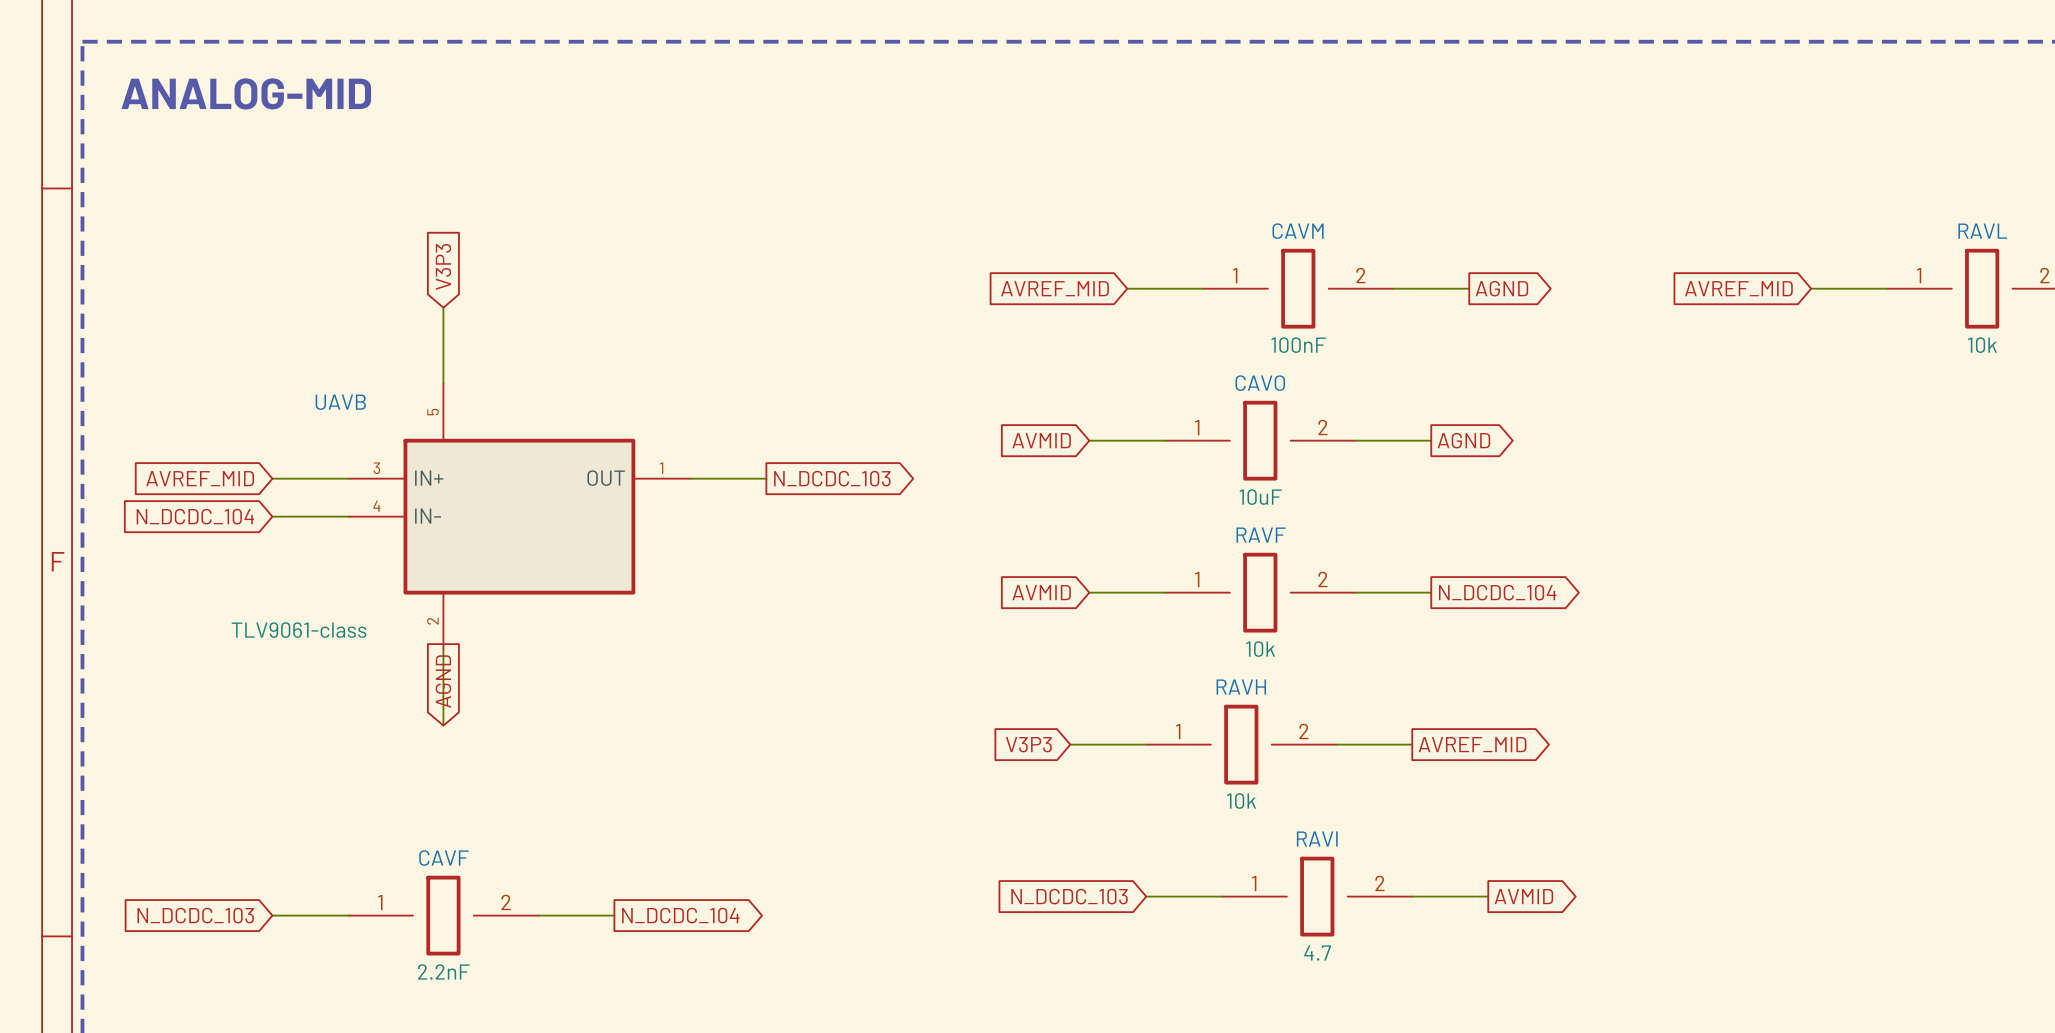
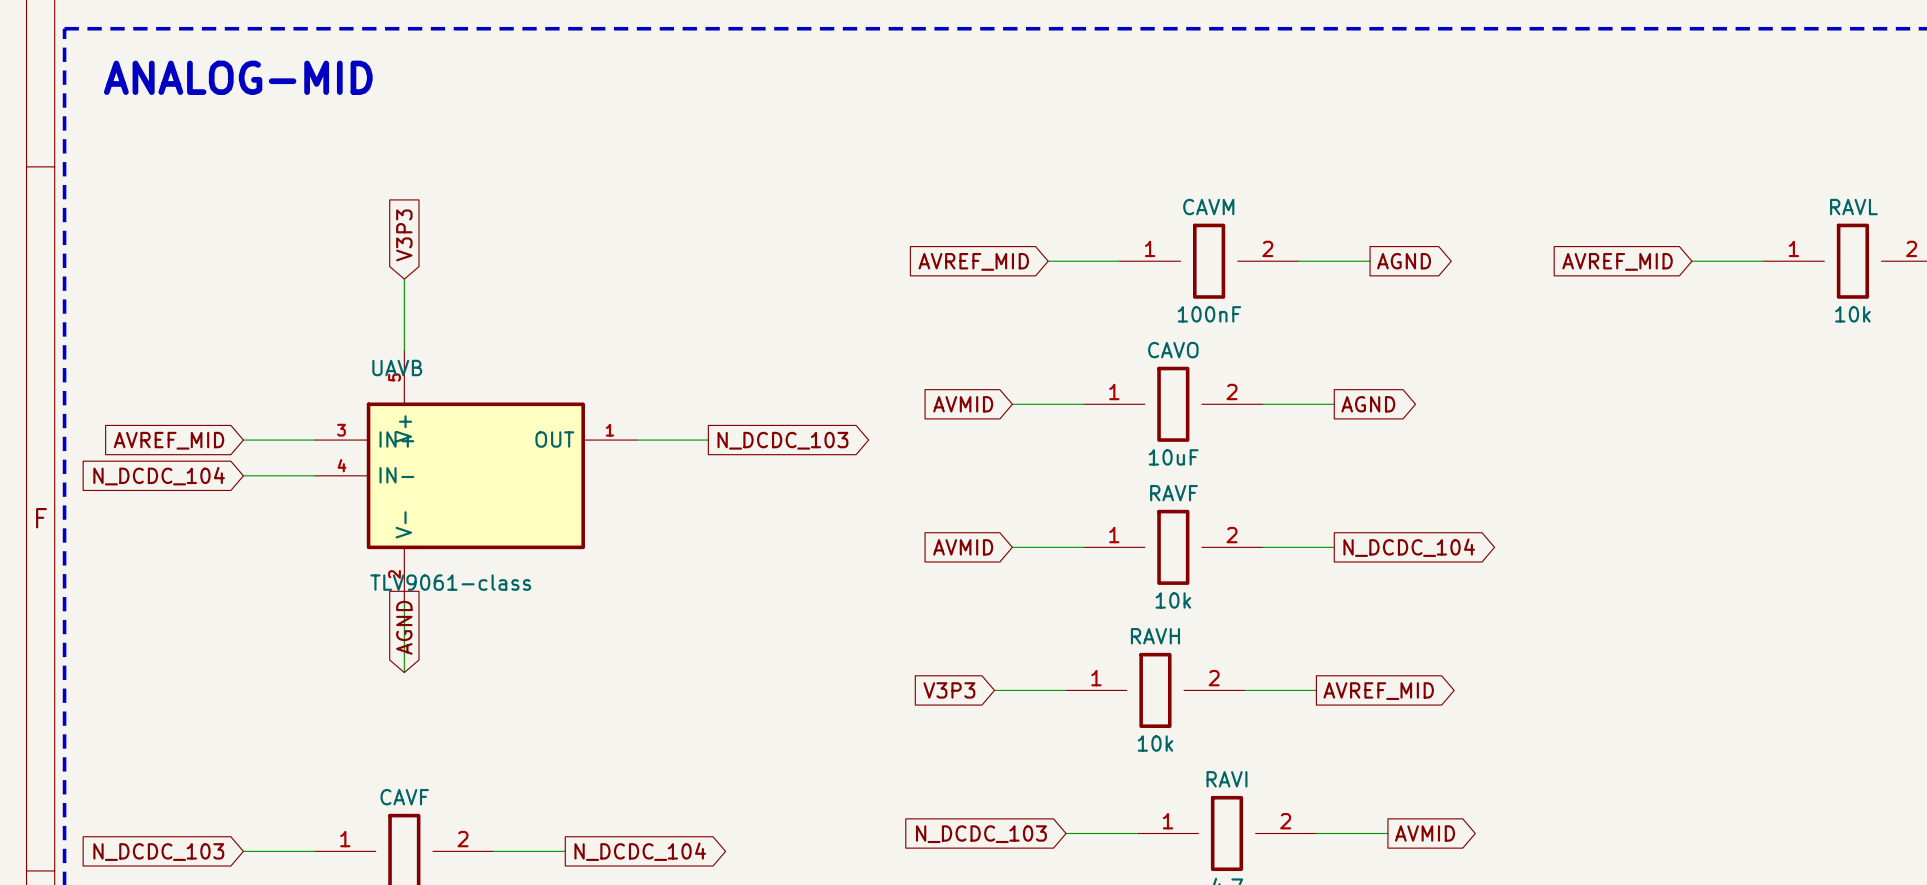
UAVB name position: UAVB (340, 402) -> UAVB (397, 367)
UAVB pin name: none -> V+ (403, 428)
UAVB pin name: none -> V- (403, 524)
UAVB value position: TLV9061-class (299, 630) -> TLV9061-class (450, 582)

